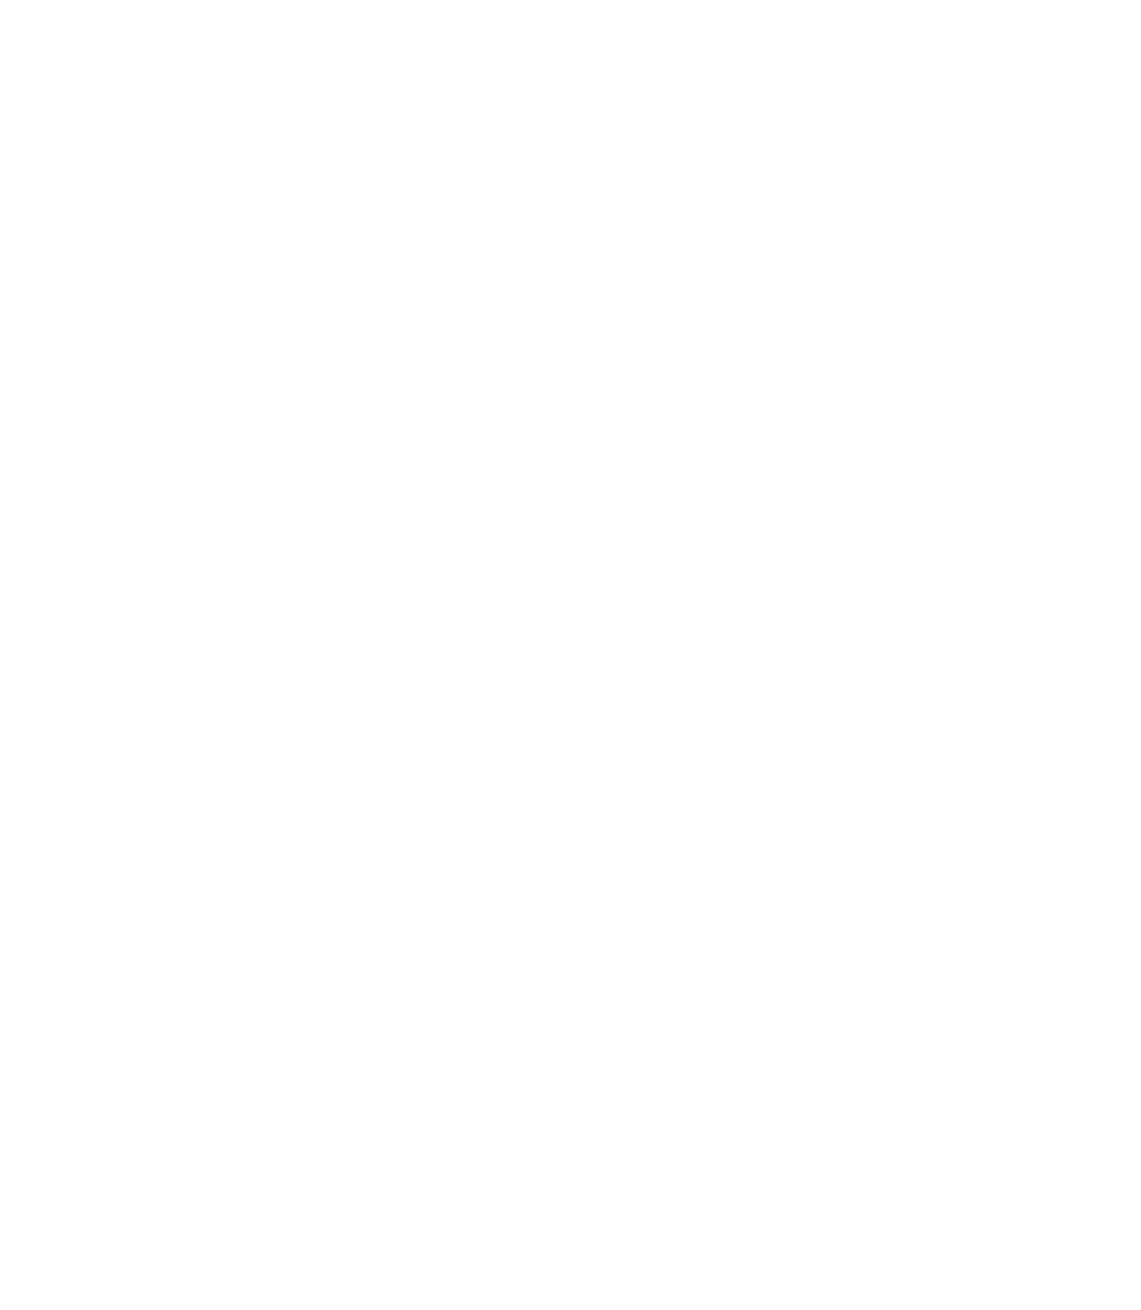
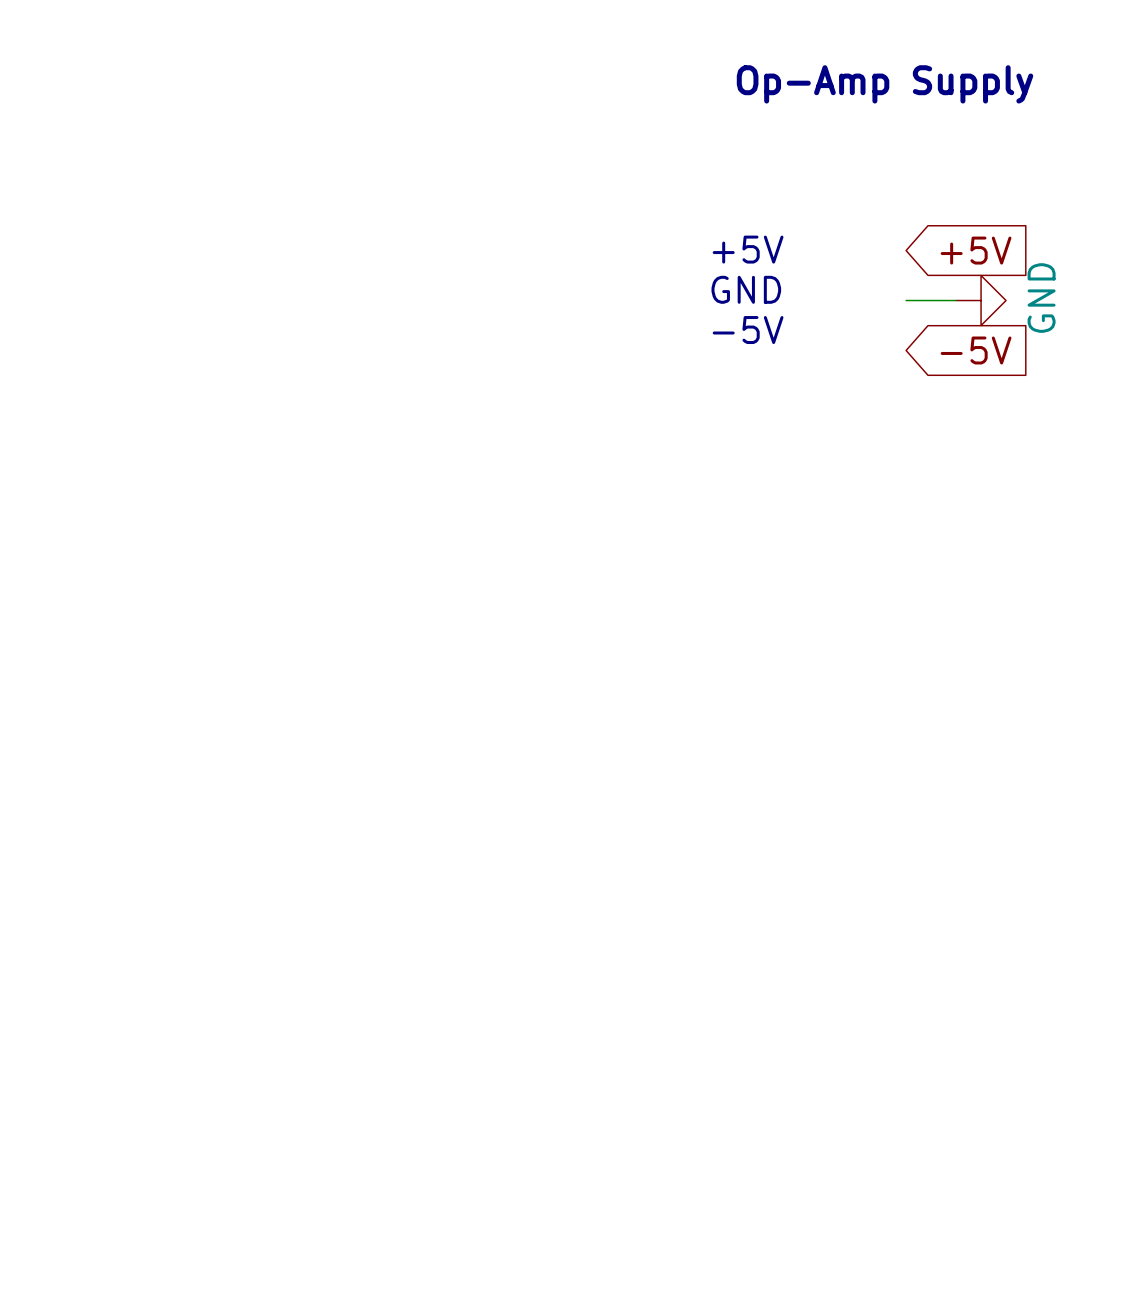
text: none -> Op-Amp Supply (885, 84)
text: none -> +5V (748, 249)
global label: none -> +5V (976, 250)
text: none -> GND (746, 289)
wire: none -> (906, 300) (956, 300)
power symbol: none -> GND (981, 300)
text: none -> -5V (748, 330)
global label: none -> -5V (976, 350)

